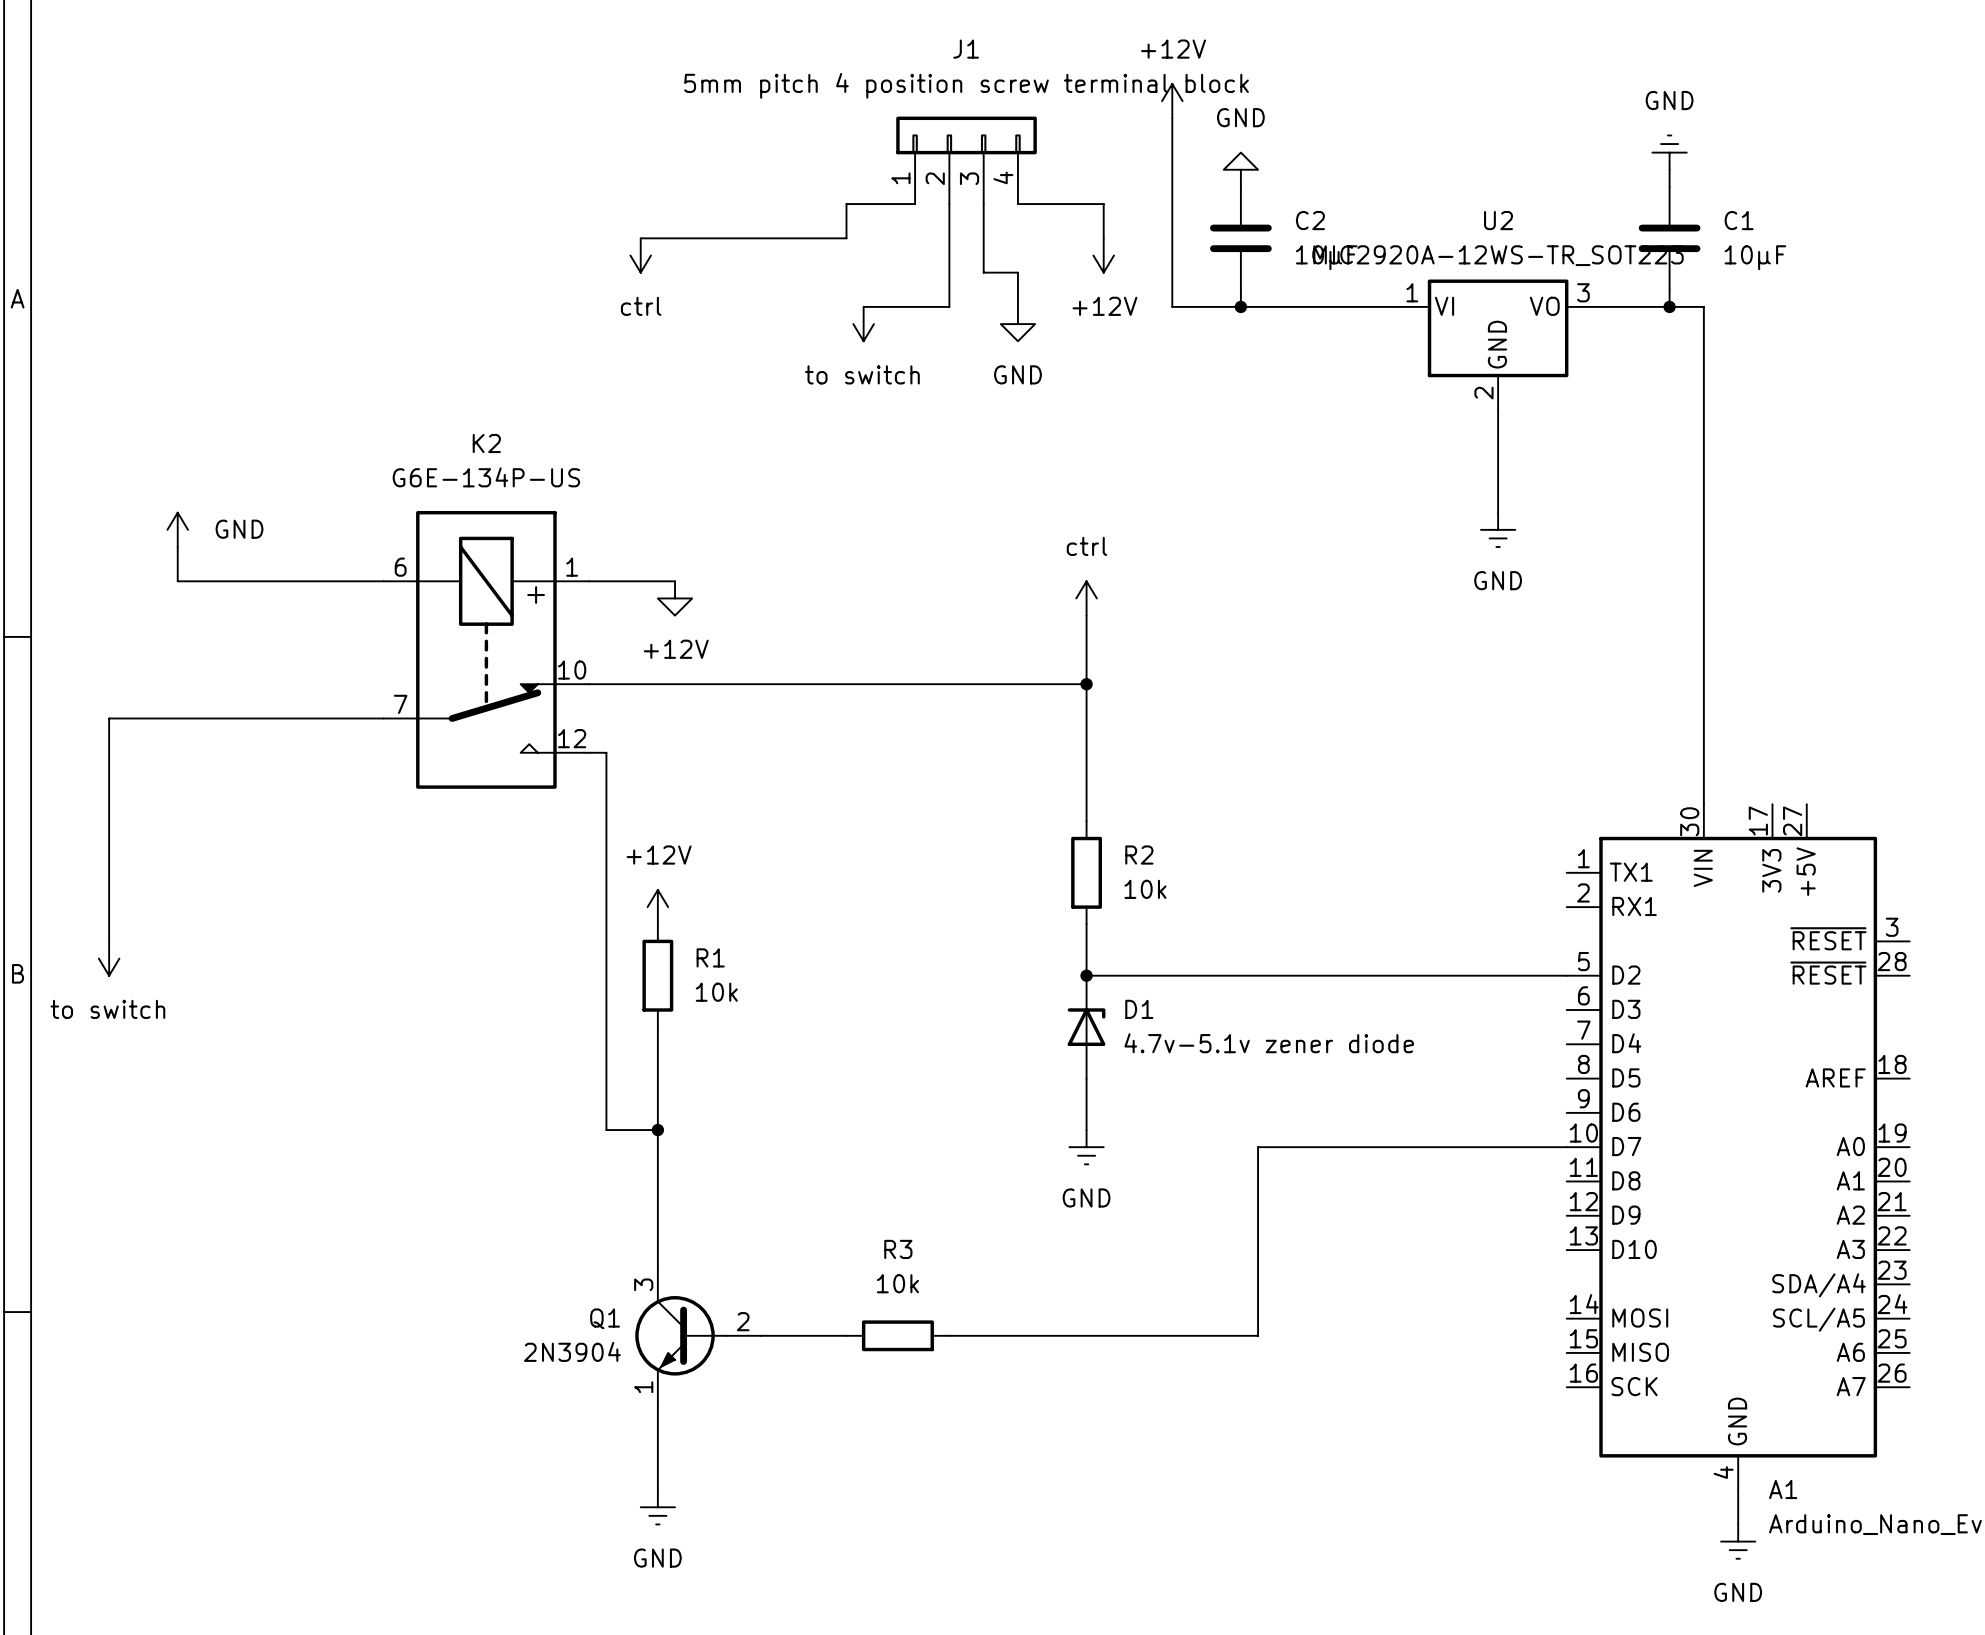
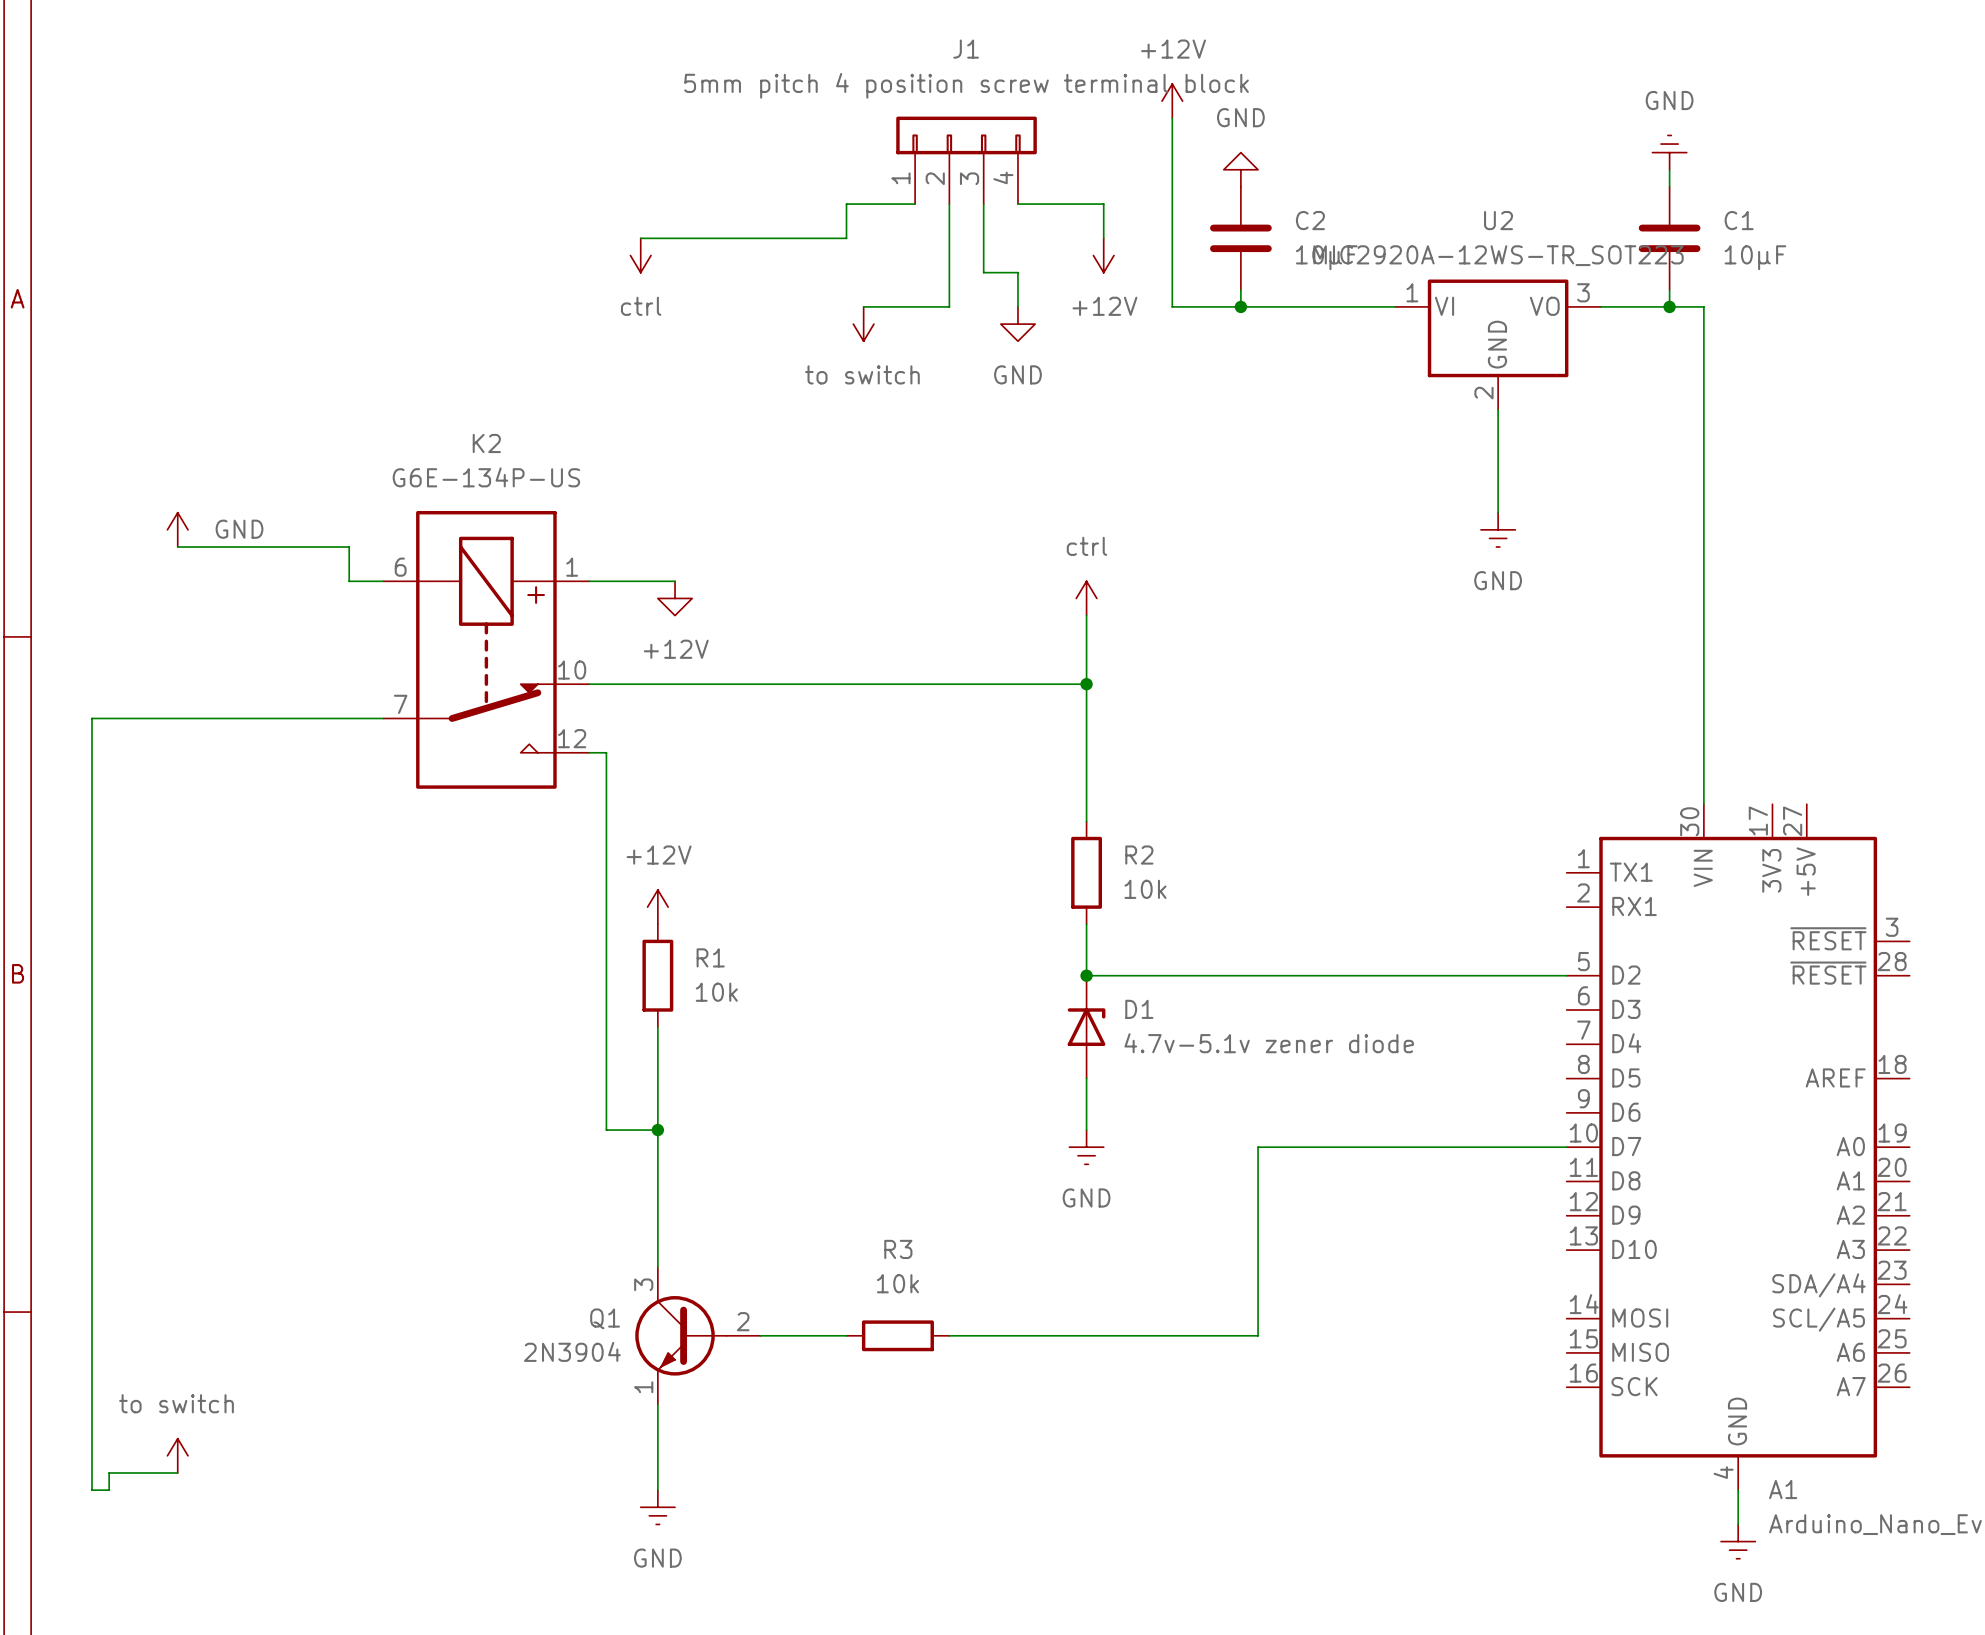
wire: (177, 547) (177, 581) (349, 581) -> (177, 547) (349, 547) (349, 581)
wire: (109, 718) (109, 941) -> (109, 718) (91, 718) (91, 1490) (109, 1490) (109, 1472) (177, 1472)
power symbol: to switch (109, 958) -> none
power symbol: none -> to switch (177, 1455)

